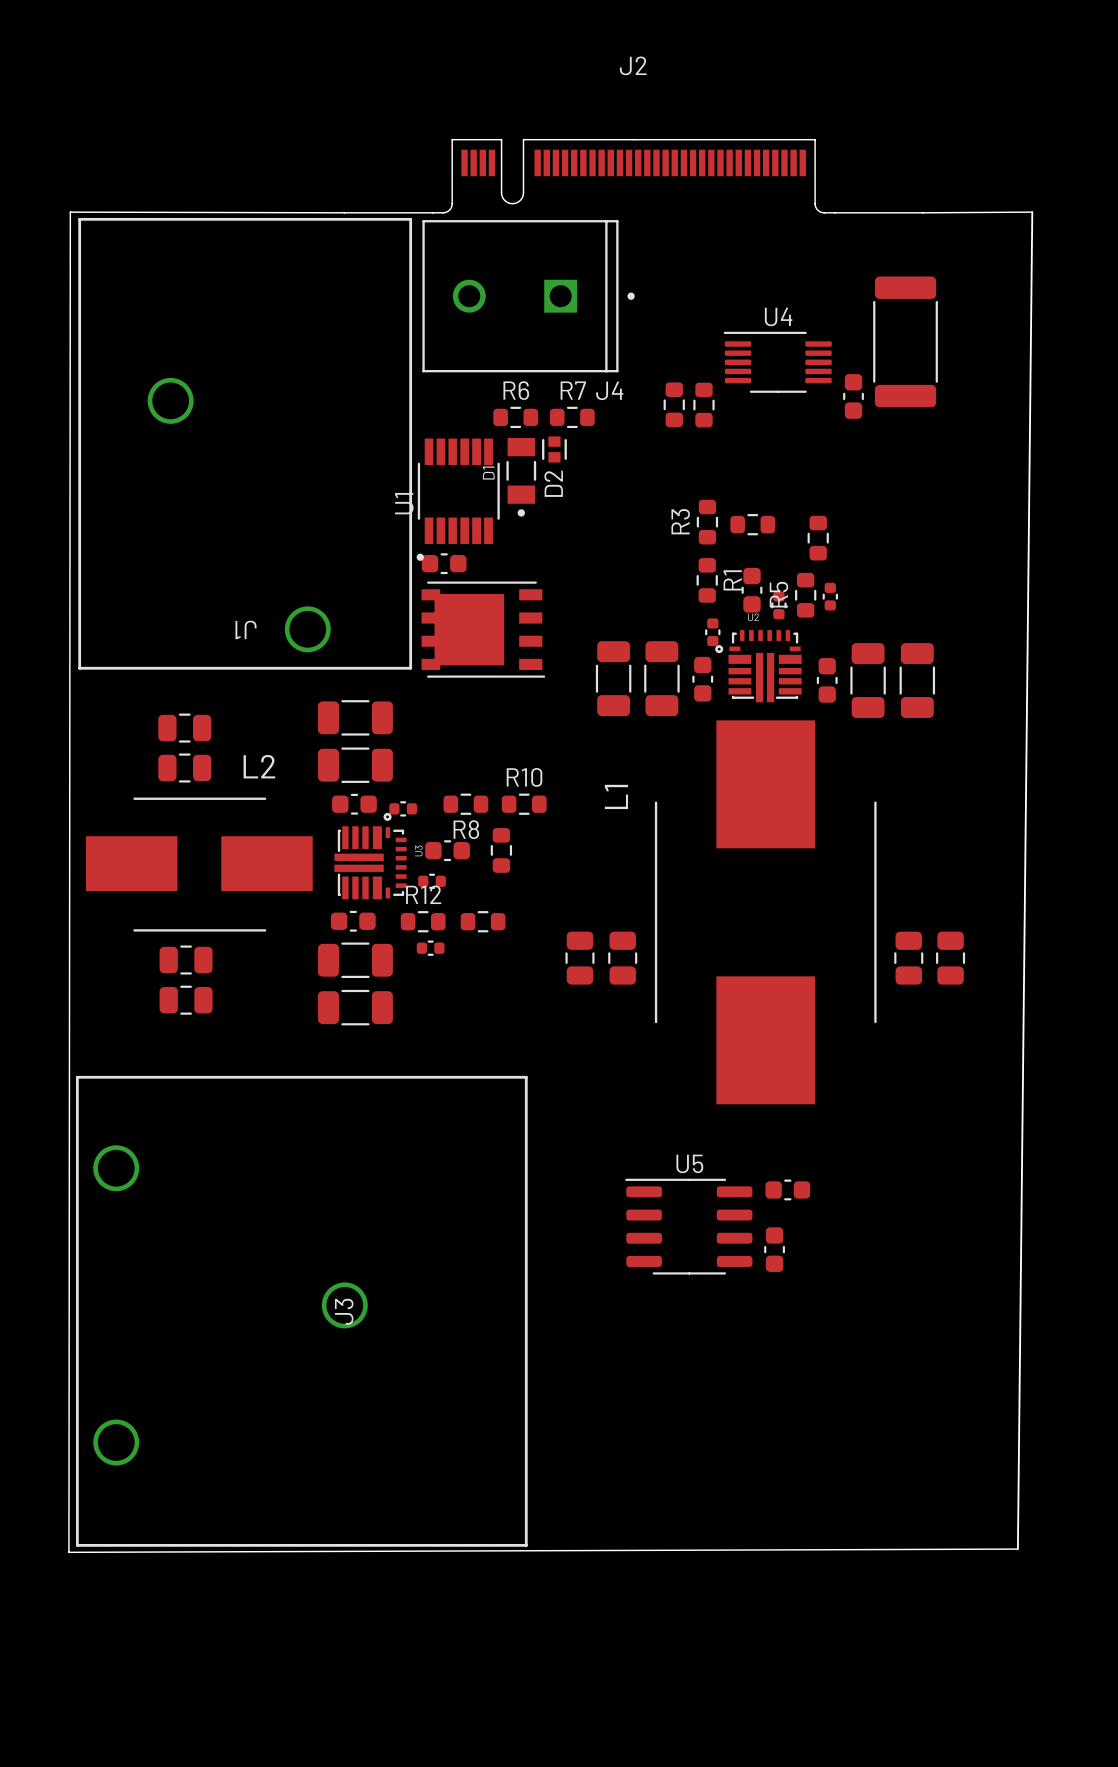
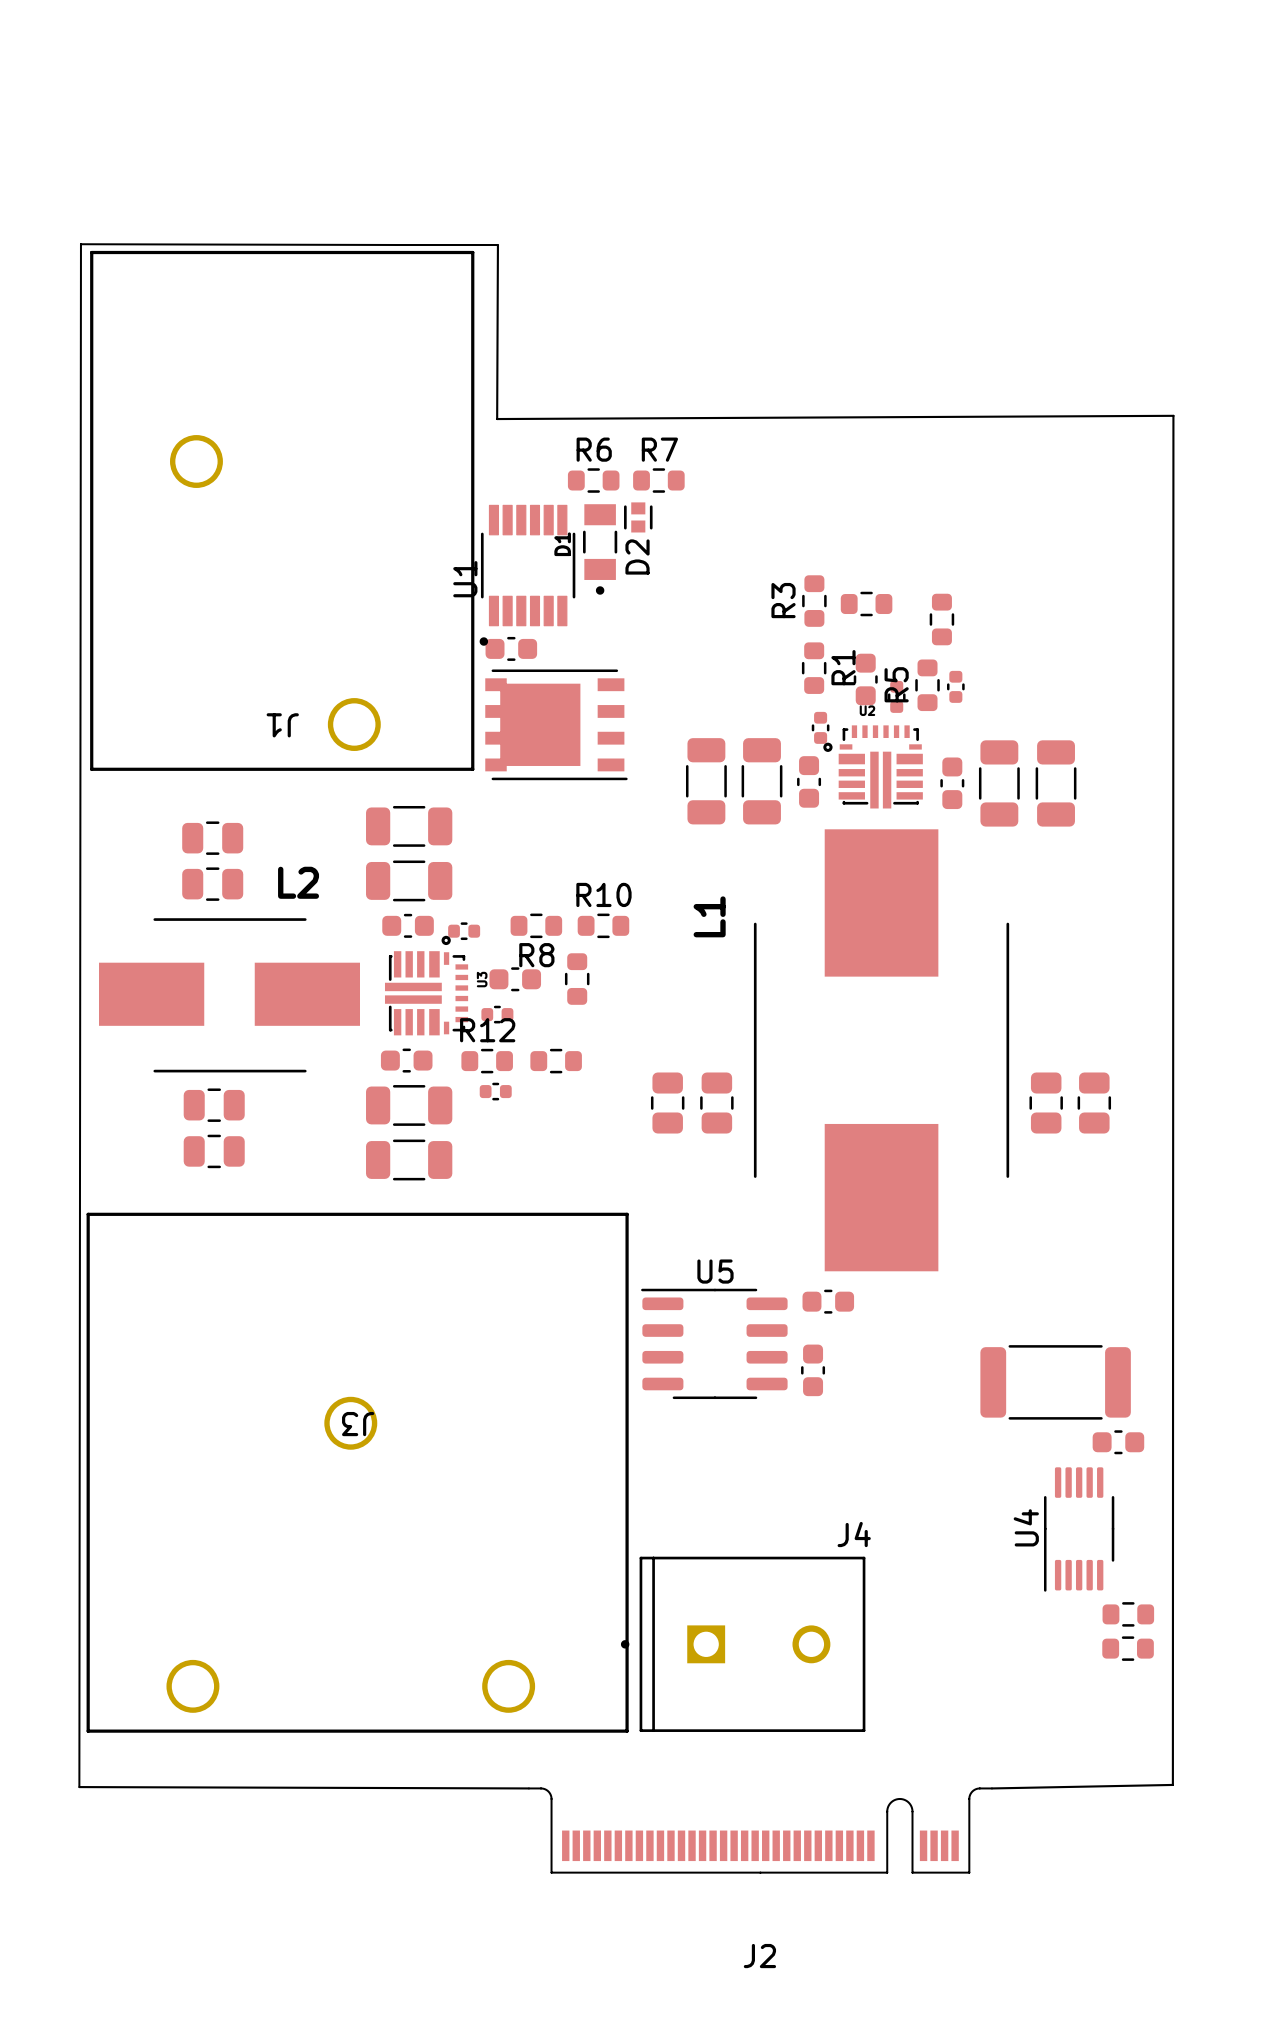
J2 rotation: 0° (633, 176) -> 180° (760, 1830)
J2 position: (633, 176) -> (760, 1830)
board edge: none -> (497, 244) (497, 419) (1173, 415) (1172, 1784) (991, 1788)
board edge: (834, 212) (1032, 212) (1017, 1549) (68, 1552) -> (528, 1788) (79, 1787)
J4 rotation: 0° (528, 296) -> 180° (743, 1644)
J4 position: (528, 296) -> (743, 1644)
part: (905, 341) -> none
U4 rotation: 0° (777, 362) -> 90° counterclockwise (1079, 1529)
U4 position: (777, 362) -> (1079, 1529)
J4 name position: J4 (609, 390) -> J4 (854, 1534)
part: (853, 396) -> none
part: (674, 404) -> none
part: (703, 405) -> none
part: none -> (828, 1301)
part: (787, 1189) -> none
part: none -> (813, 1370)
part: none -> (1055, 1382)
U5 position: (688, 1226) -> (714, 1343)
part: (774, 1249) -> none
part: none -> (1118, 1442)
J3 rotation: 0° (301, 1311) -> 90° counterclockwise (357, 1472)
part: none -> (1128, 1614)
part: none -> (1128, 1648)

